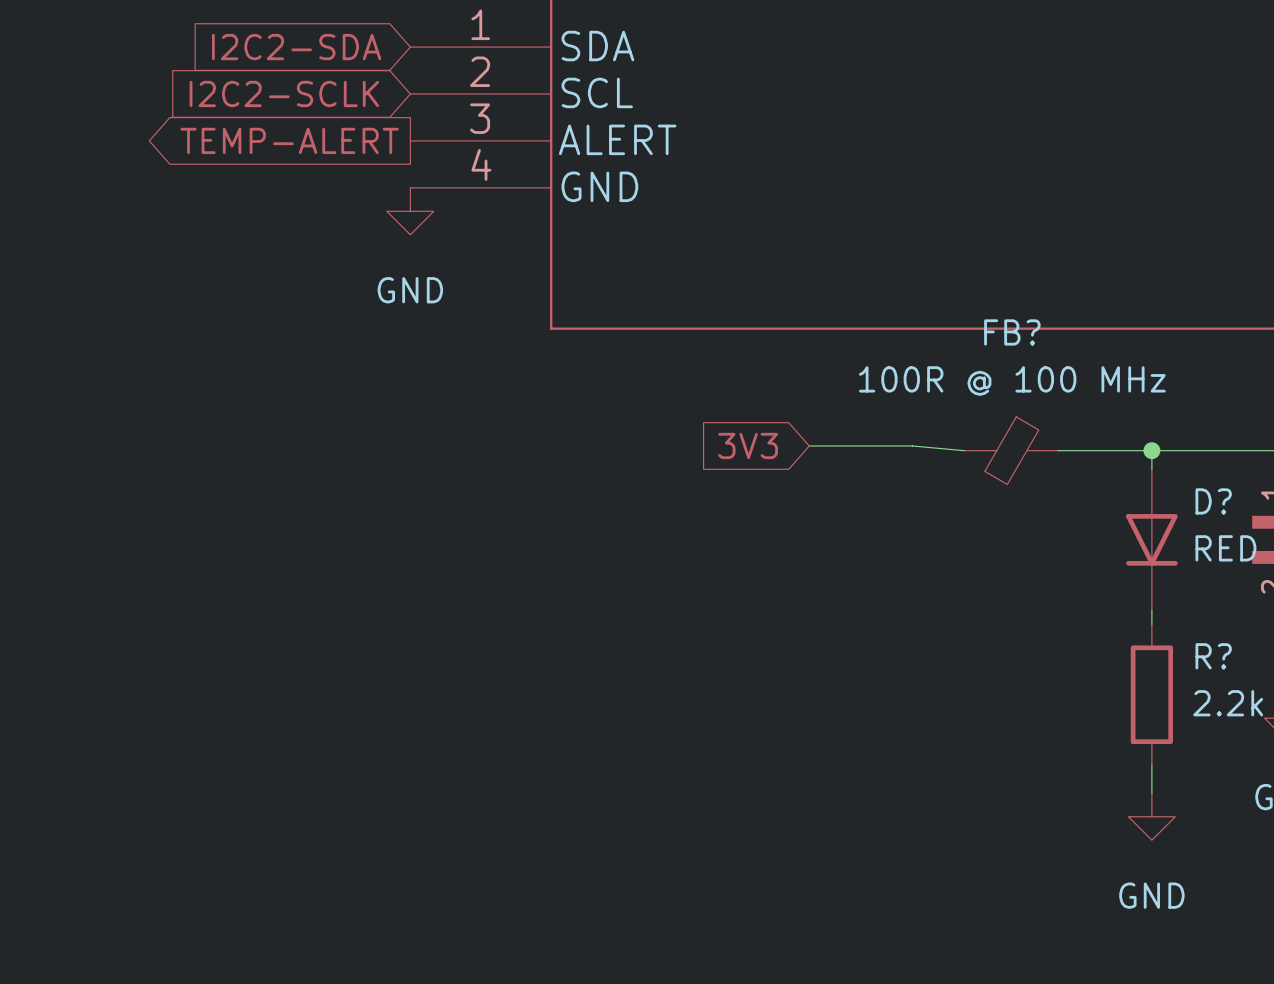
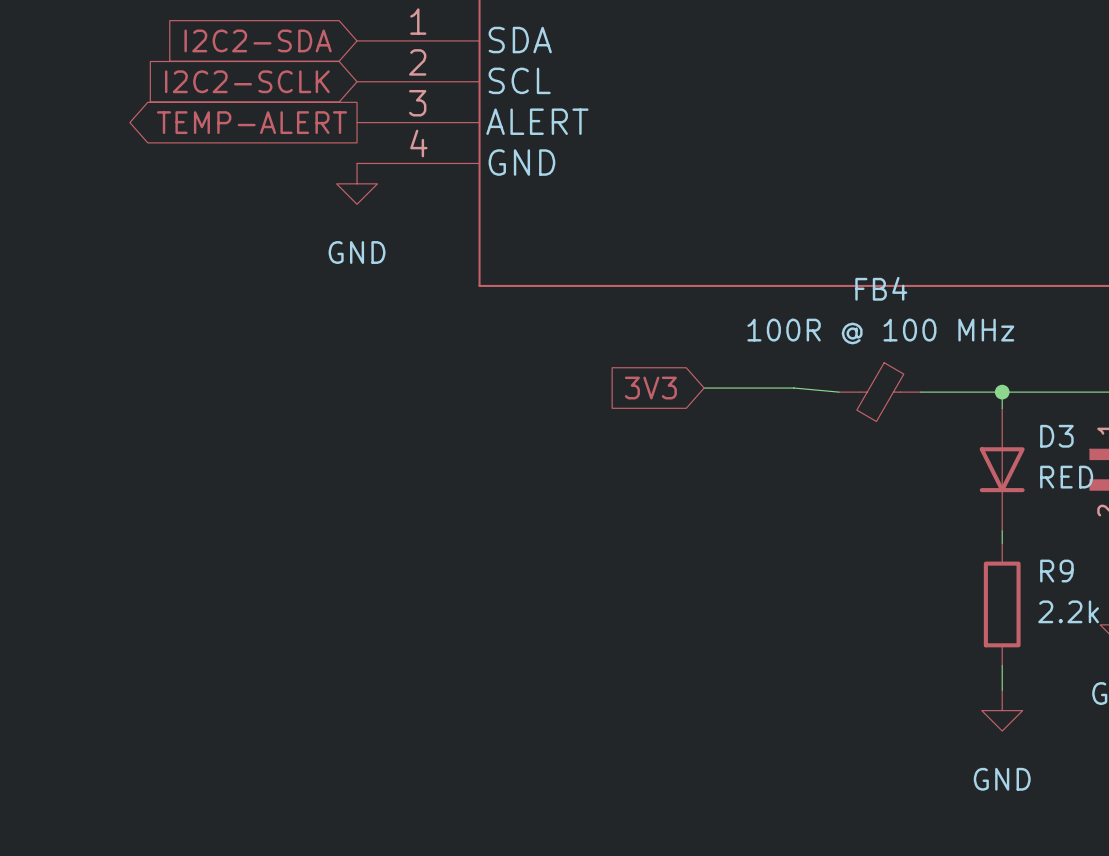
FB? name: FB? (1012, 332) -> FB4 (881, 288)
D? name: D? (1213, 501) -> D3 (1056, 436)
R? name: R? (1213, 656) -> R9 (1056, 571)

